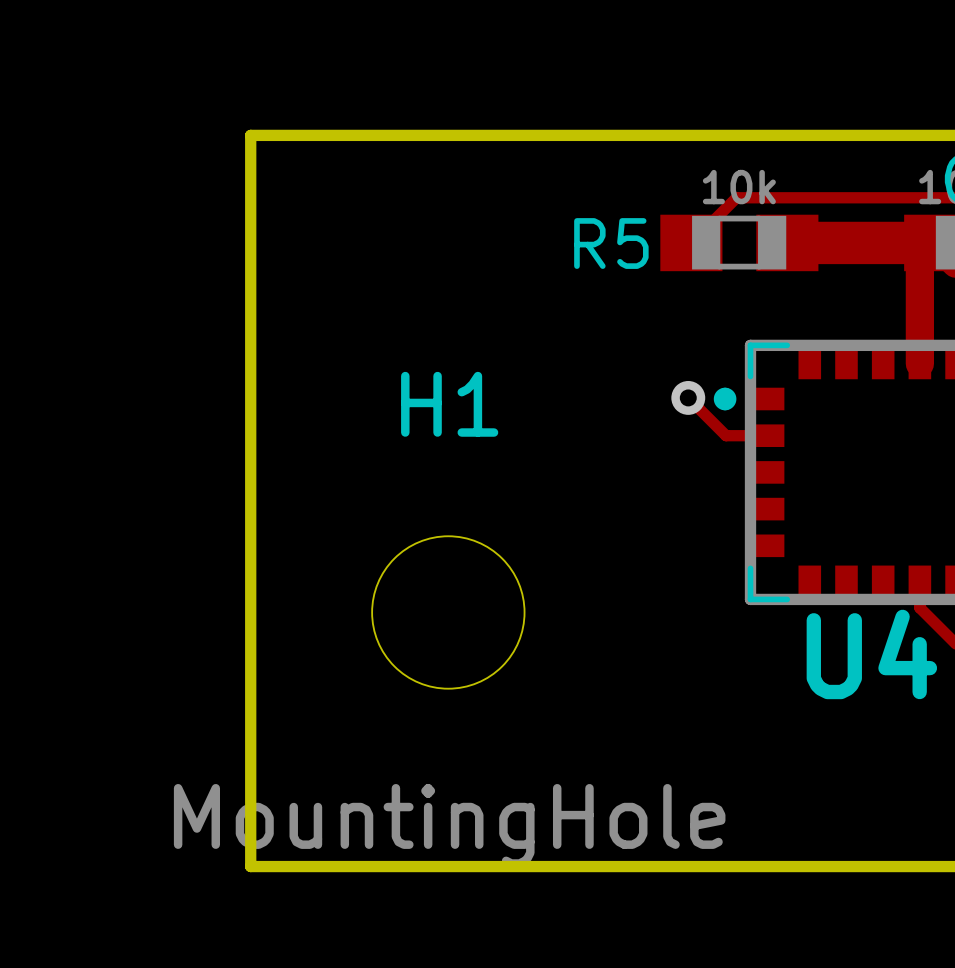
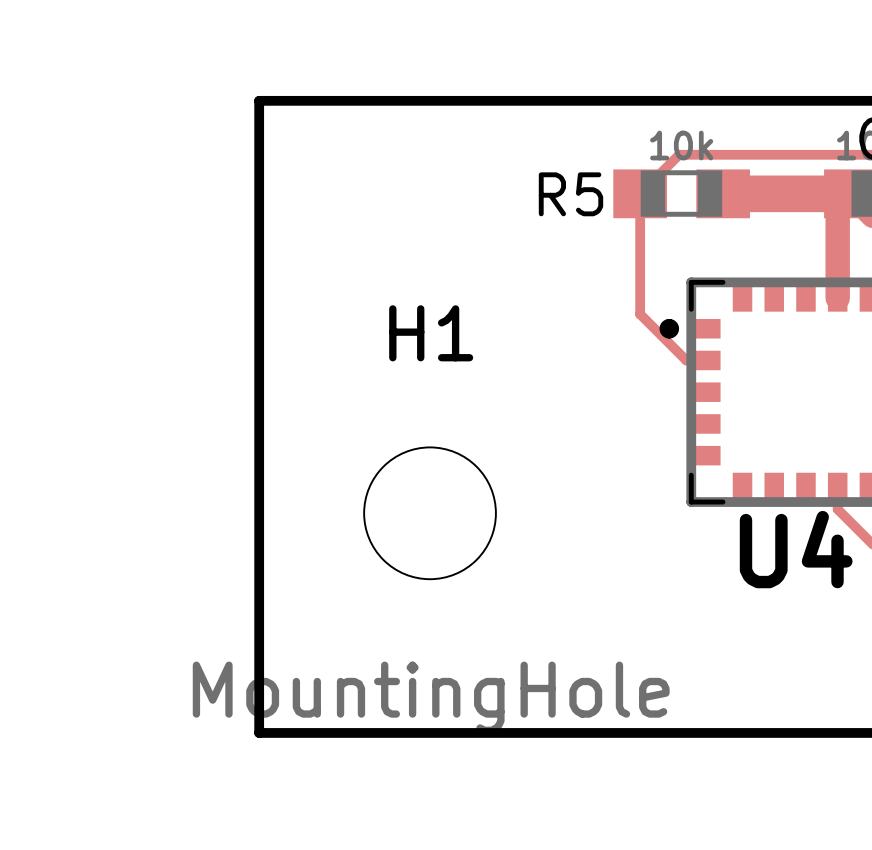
track: (688, 397) (726, 435) (744, 435) -> (640, 193) (640, 314) (686, 360)
via: (688, 397) -> none

